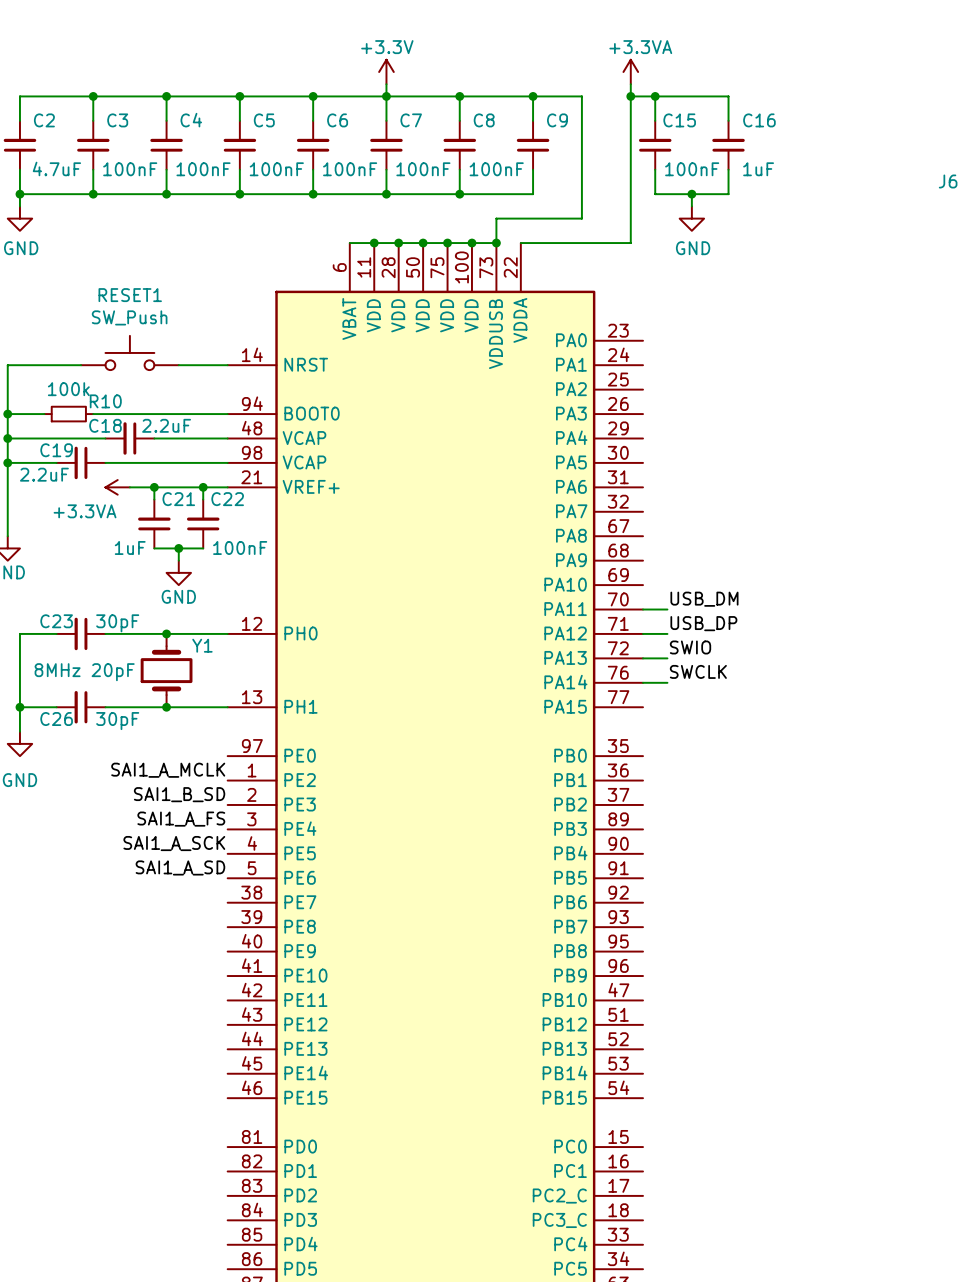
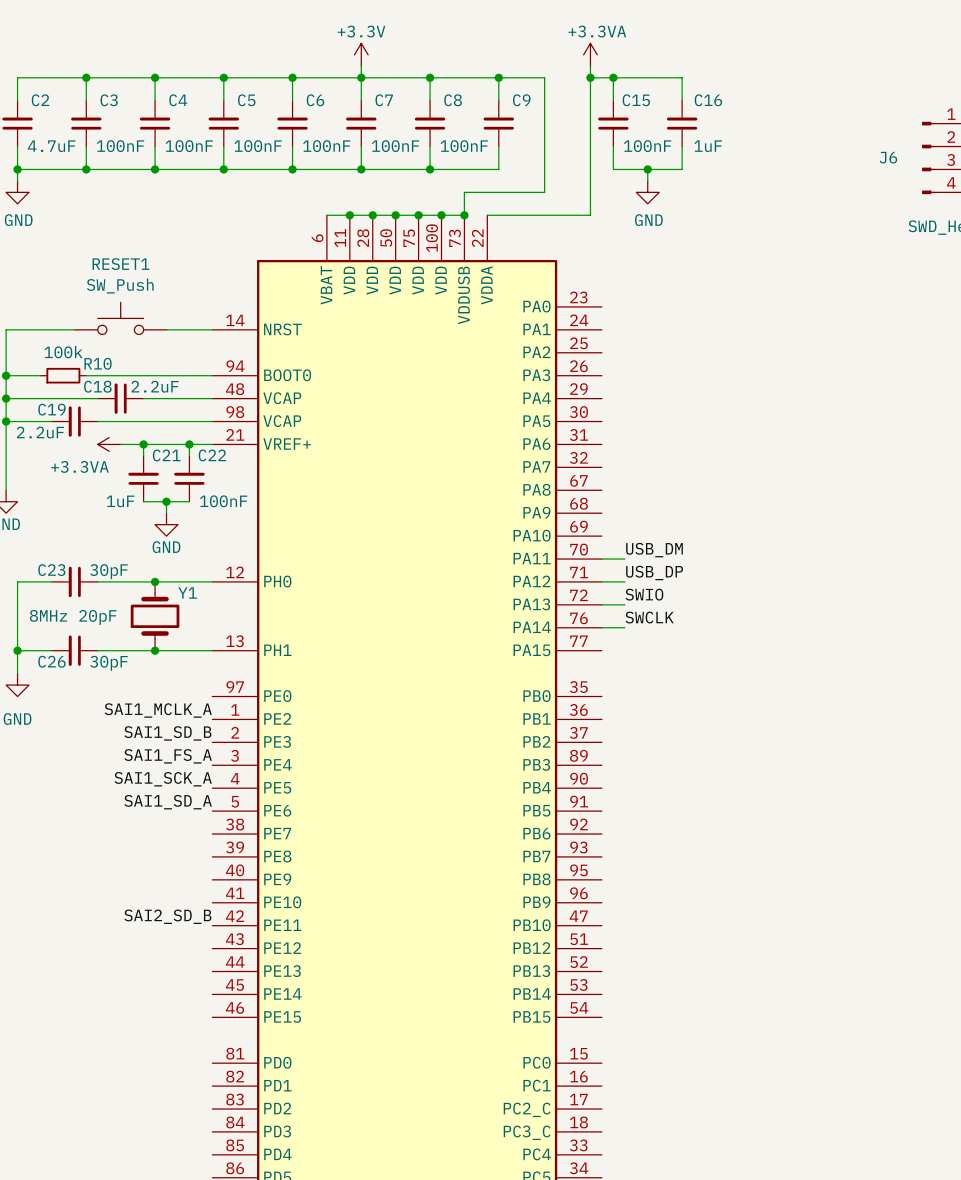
label: SAI1_A_MCLK (168, 770) -> SAI1_MCLK_A (158, 710)
label: SAI1_B_SD (179, 794) -> SAI1_SD_B (167, 733)
label: SAI1_A_FS (181, 819) -> SAI1_FS_A (168, 756)
label: SAI1_A_SCK (174, 843) -> SAI1_SCK_A (163, 779)
label: SAI1_A_SD (180, 867) -> SAI1_SD_A (168, 802)
label: none -> SAI2_SD_B (167, 916)

